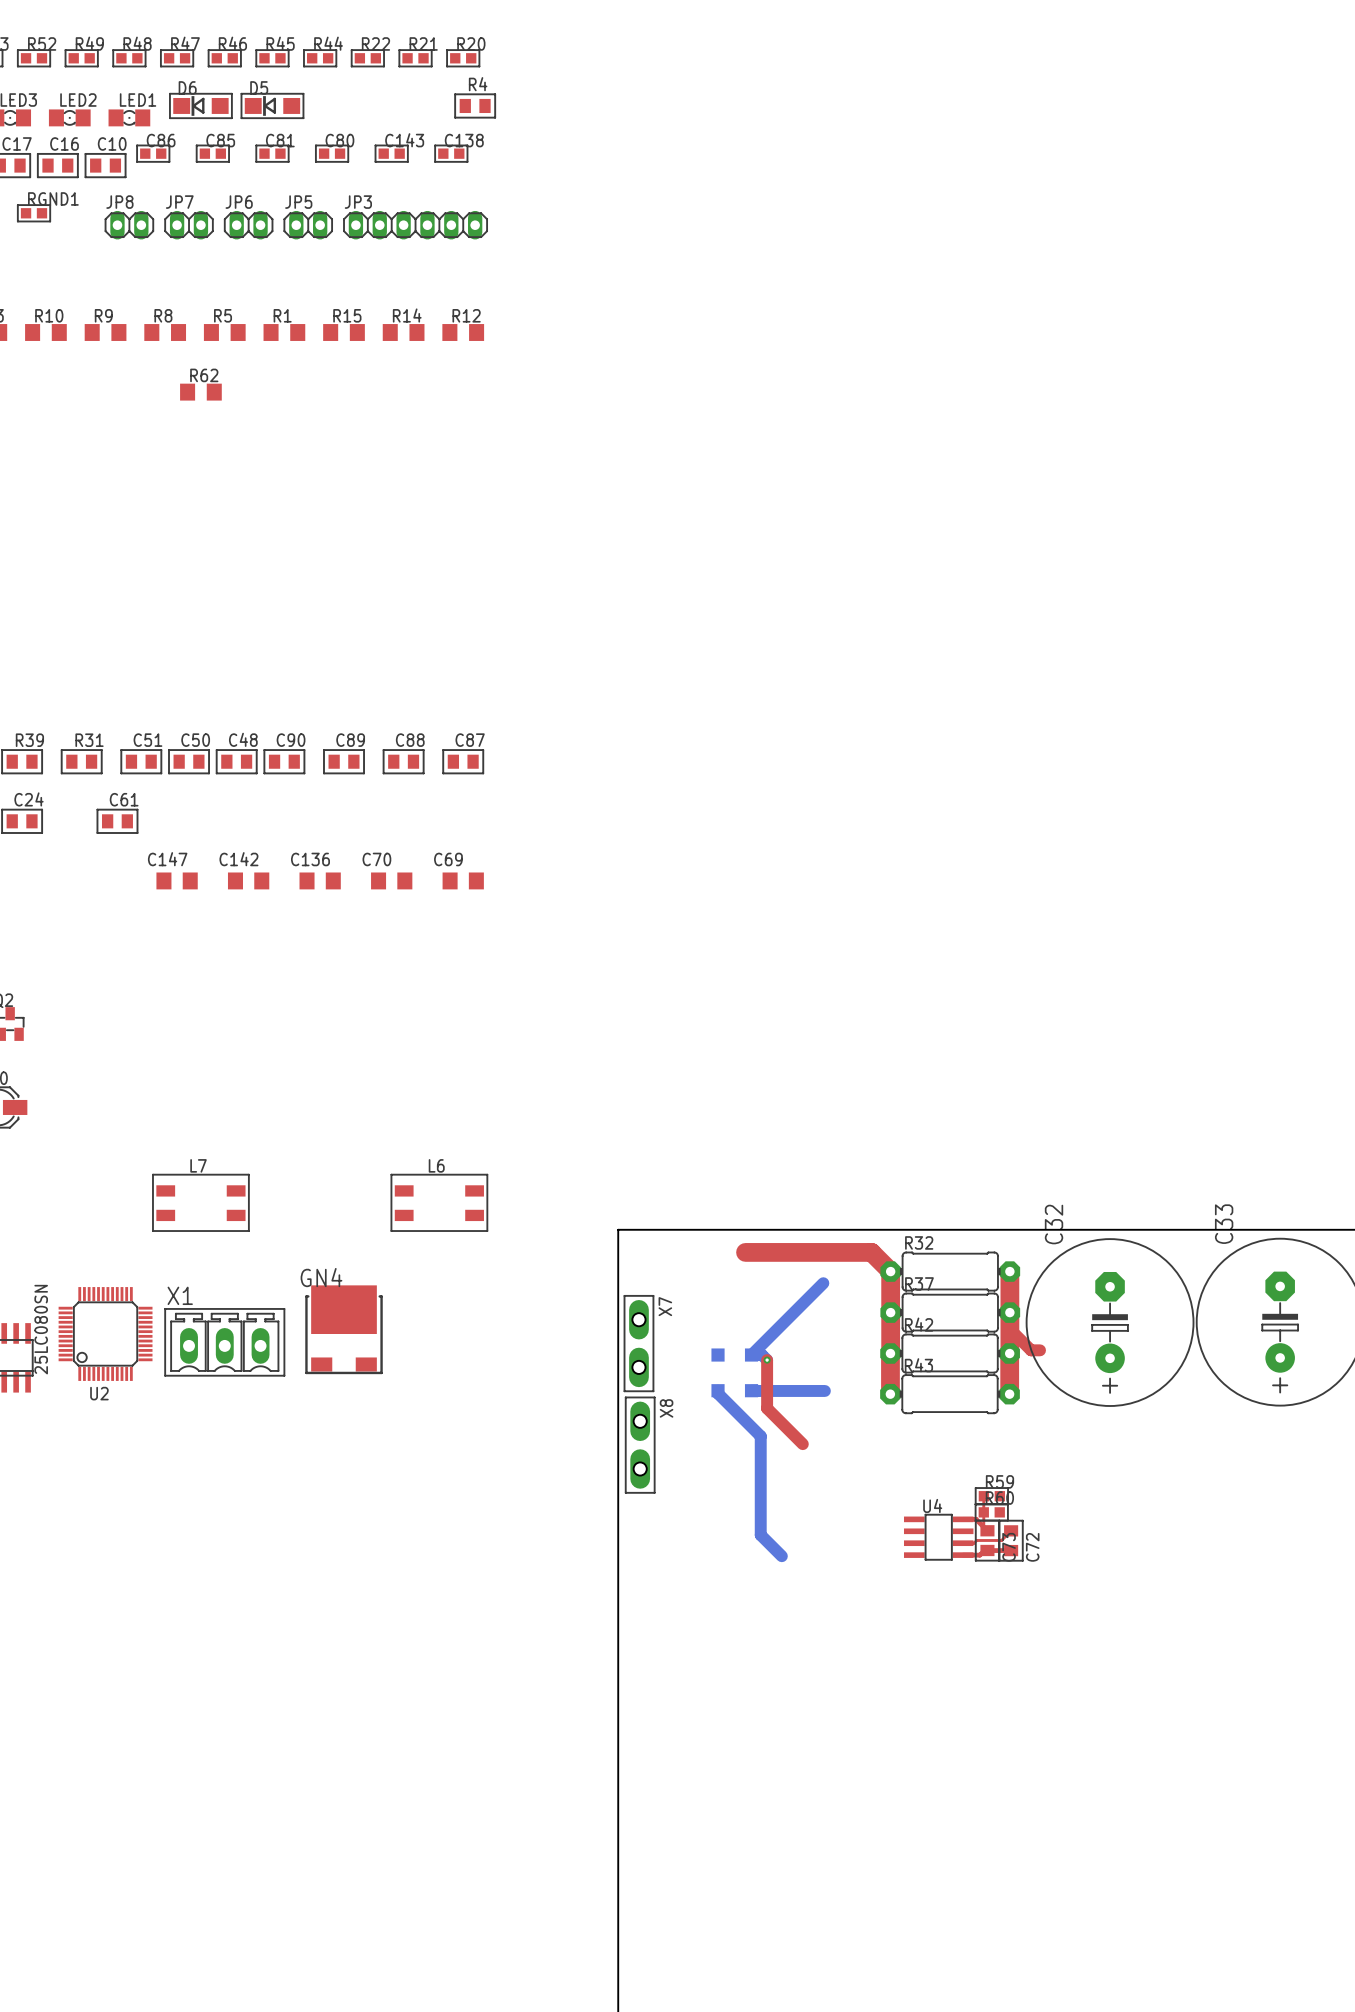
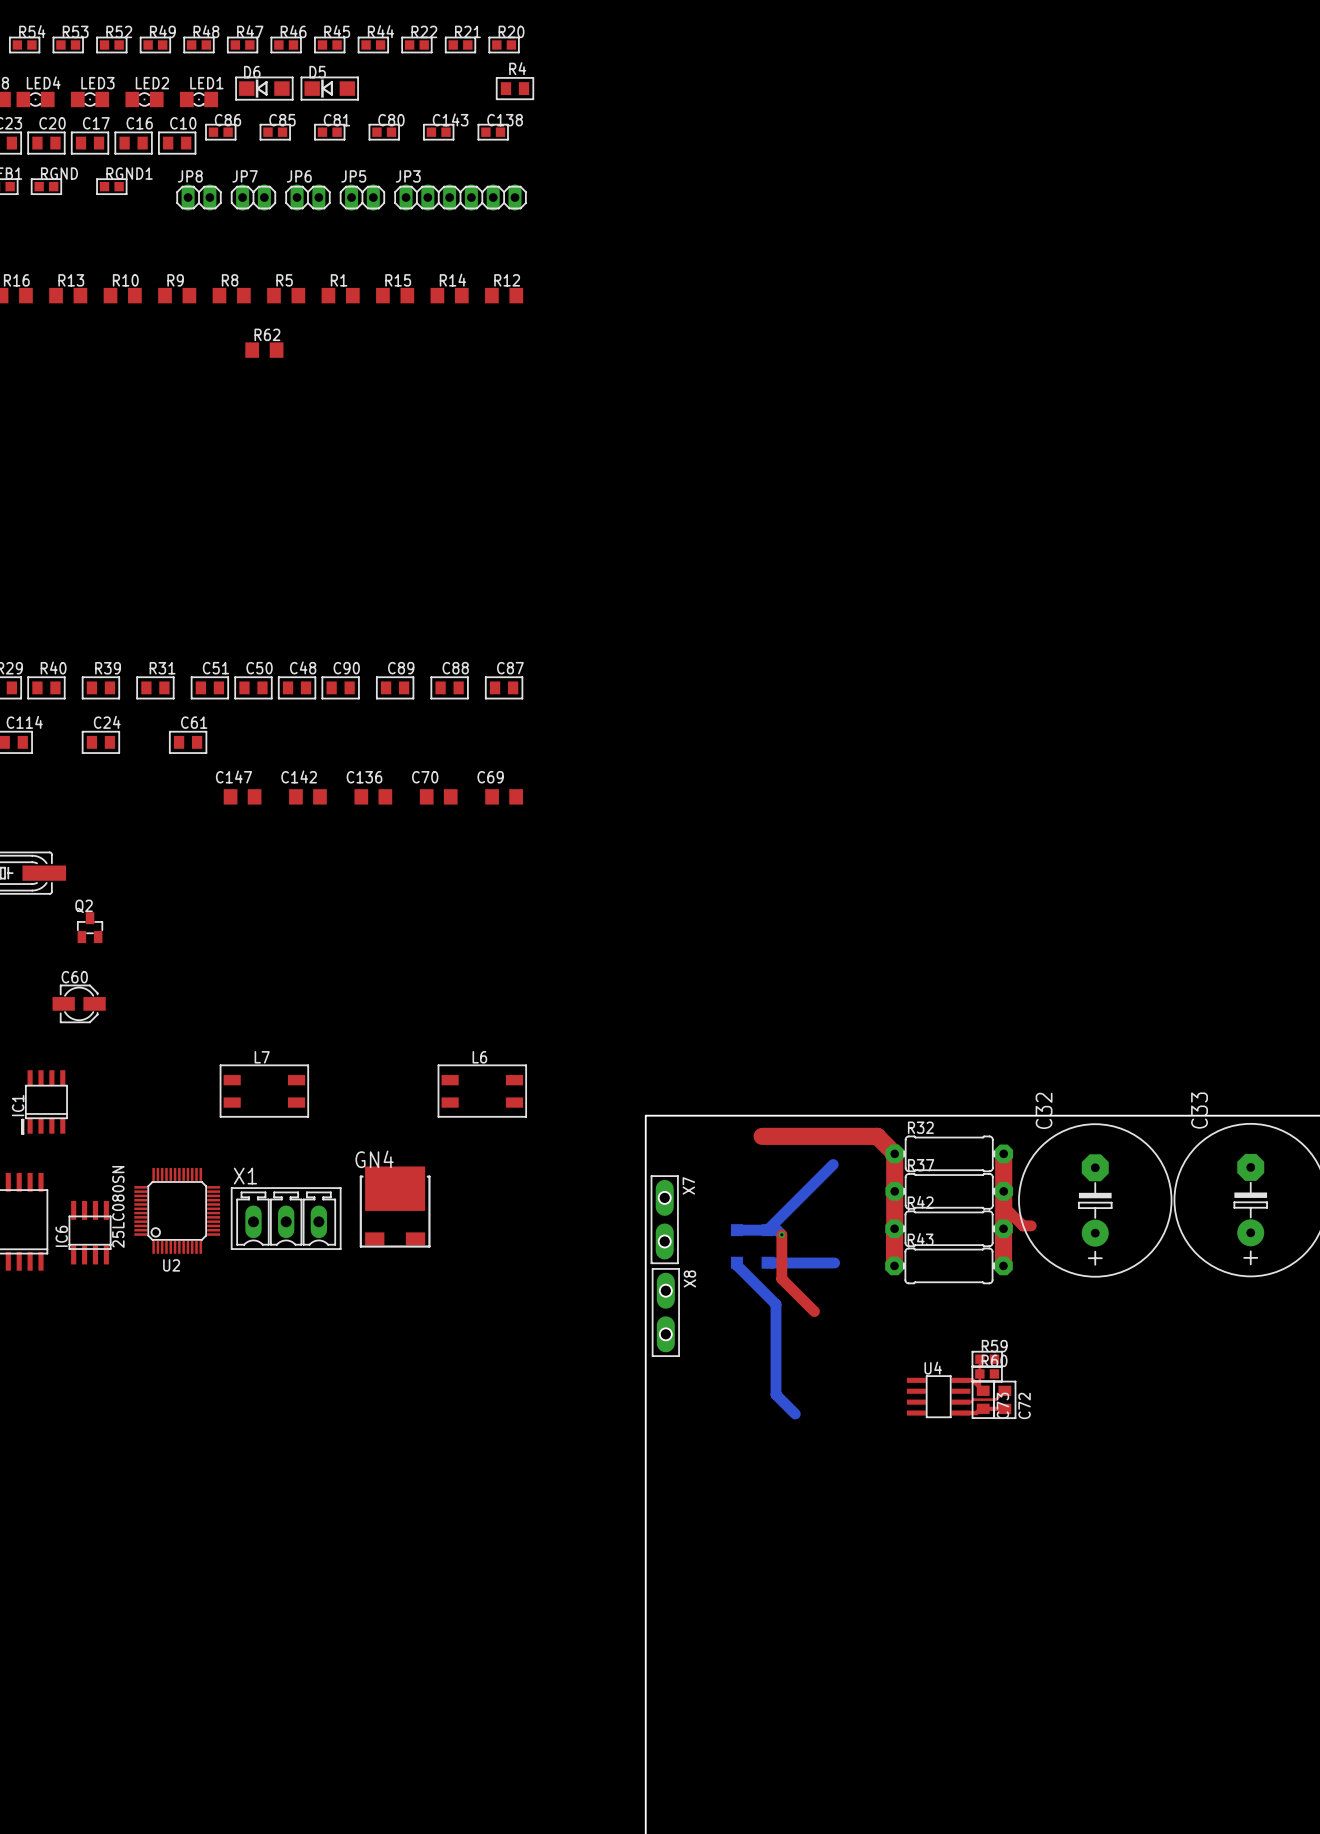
bottom track: none -> (736, 1230) (767, 1230)

